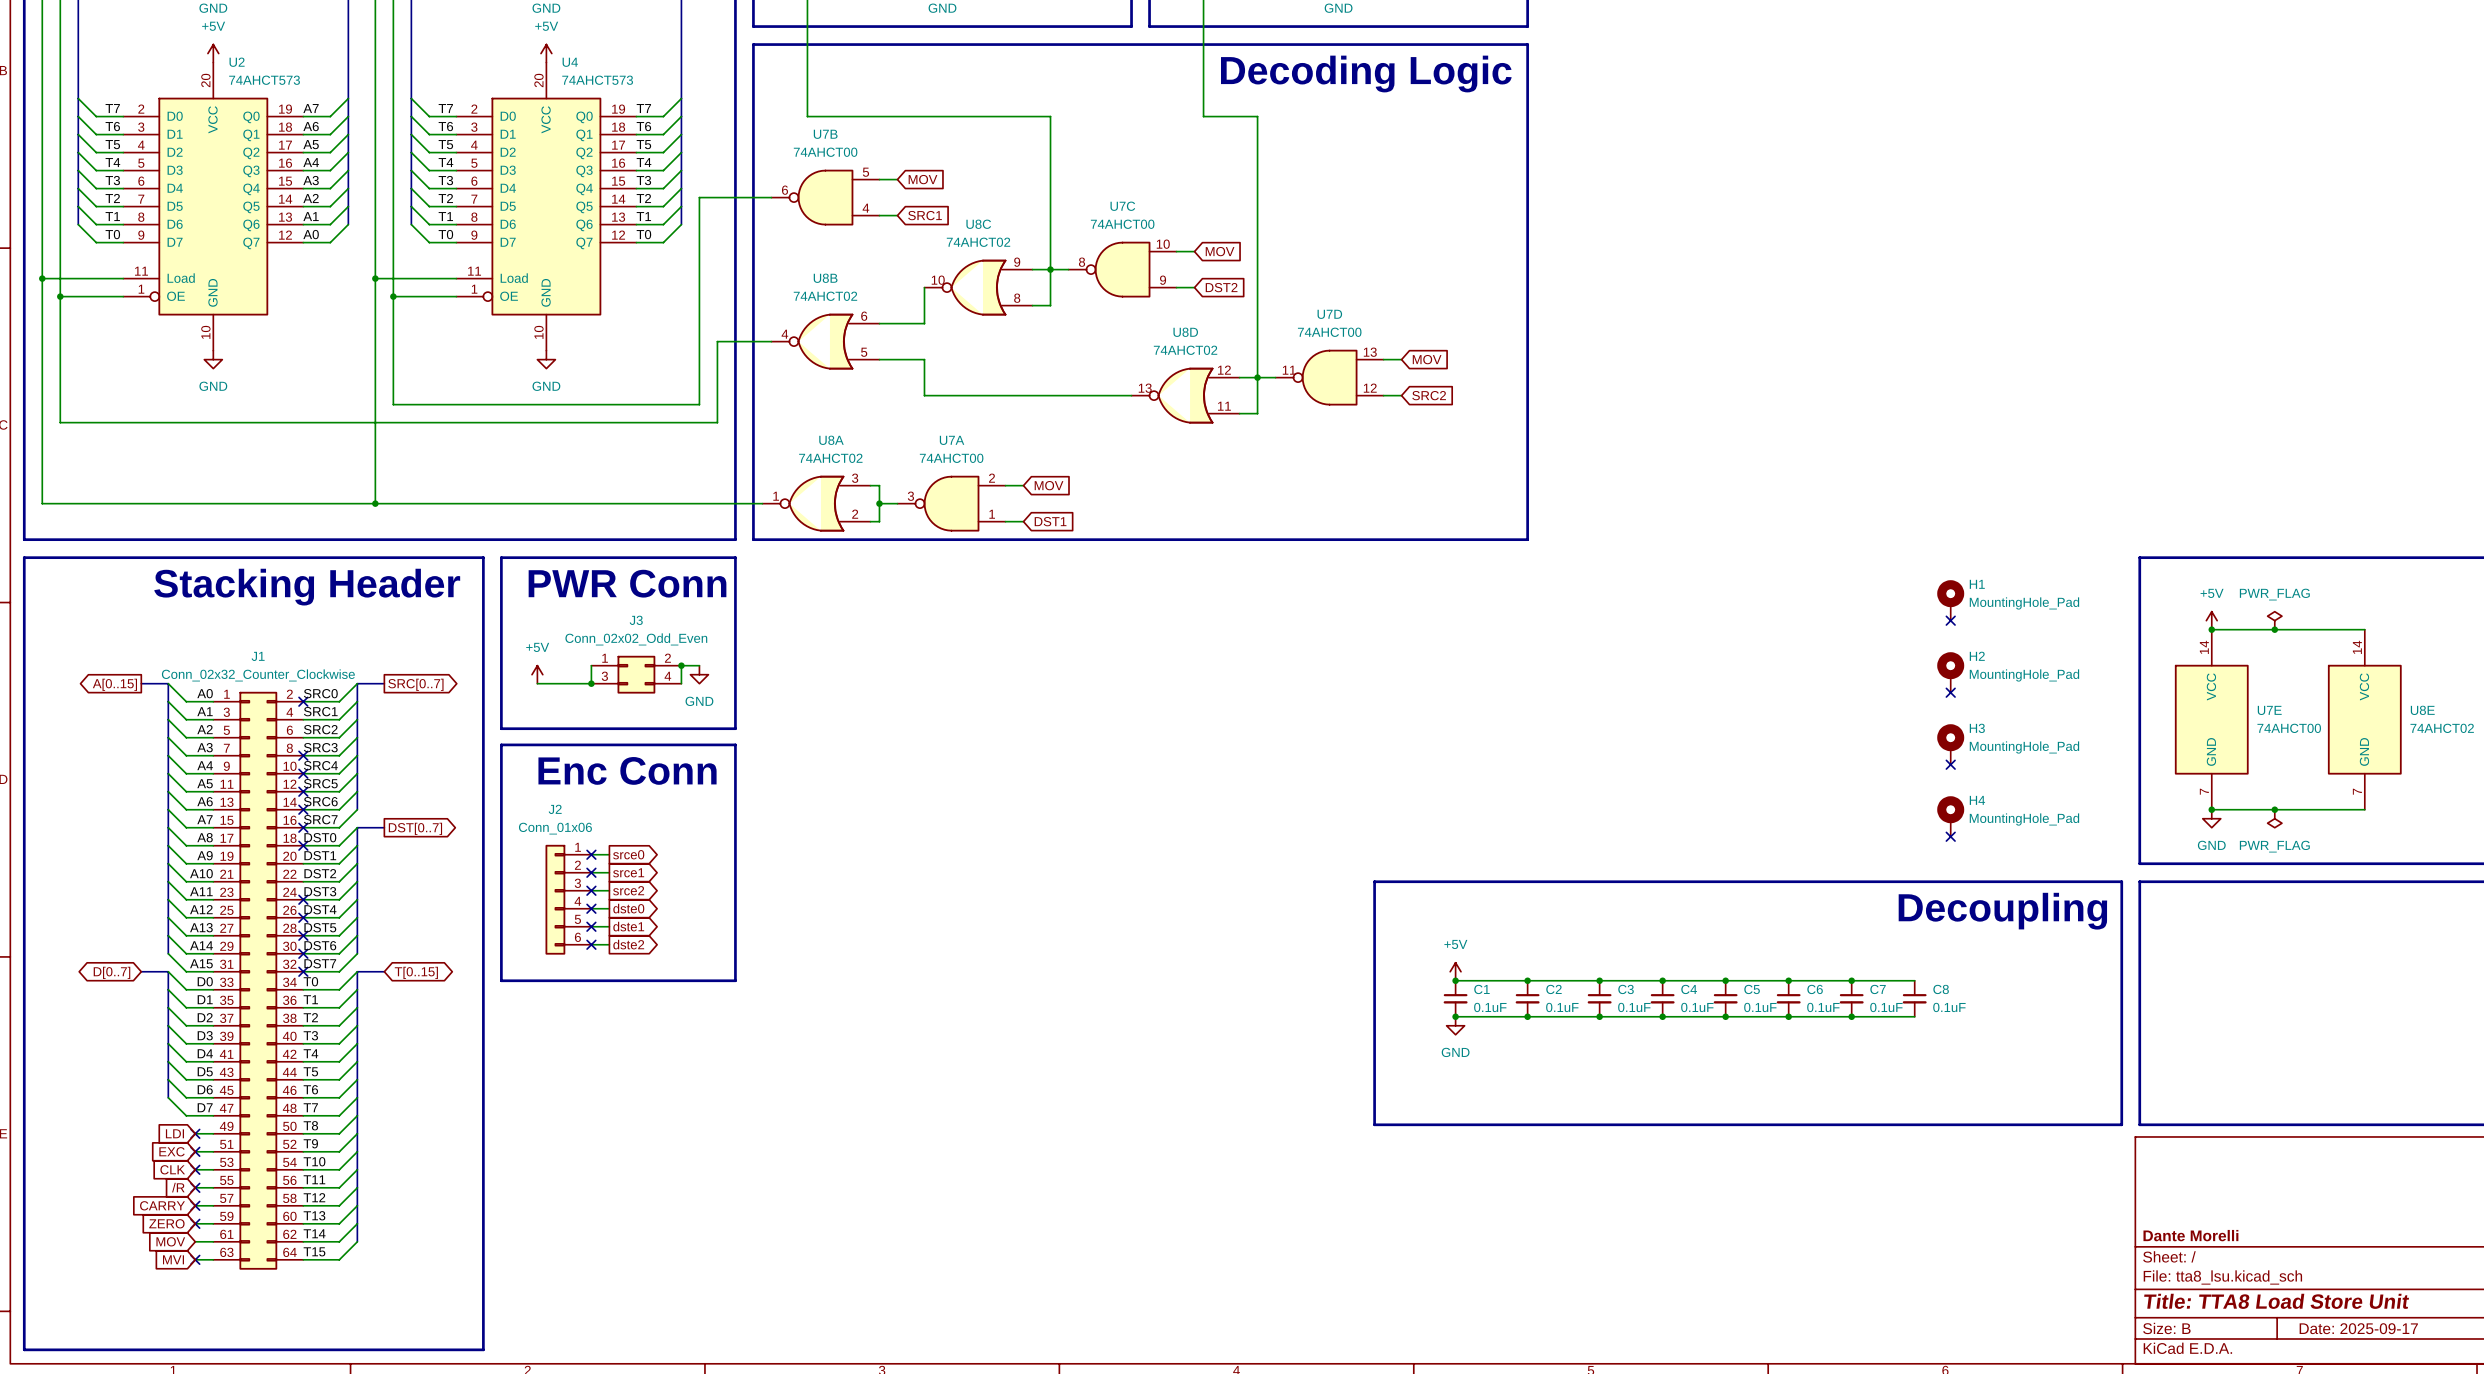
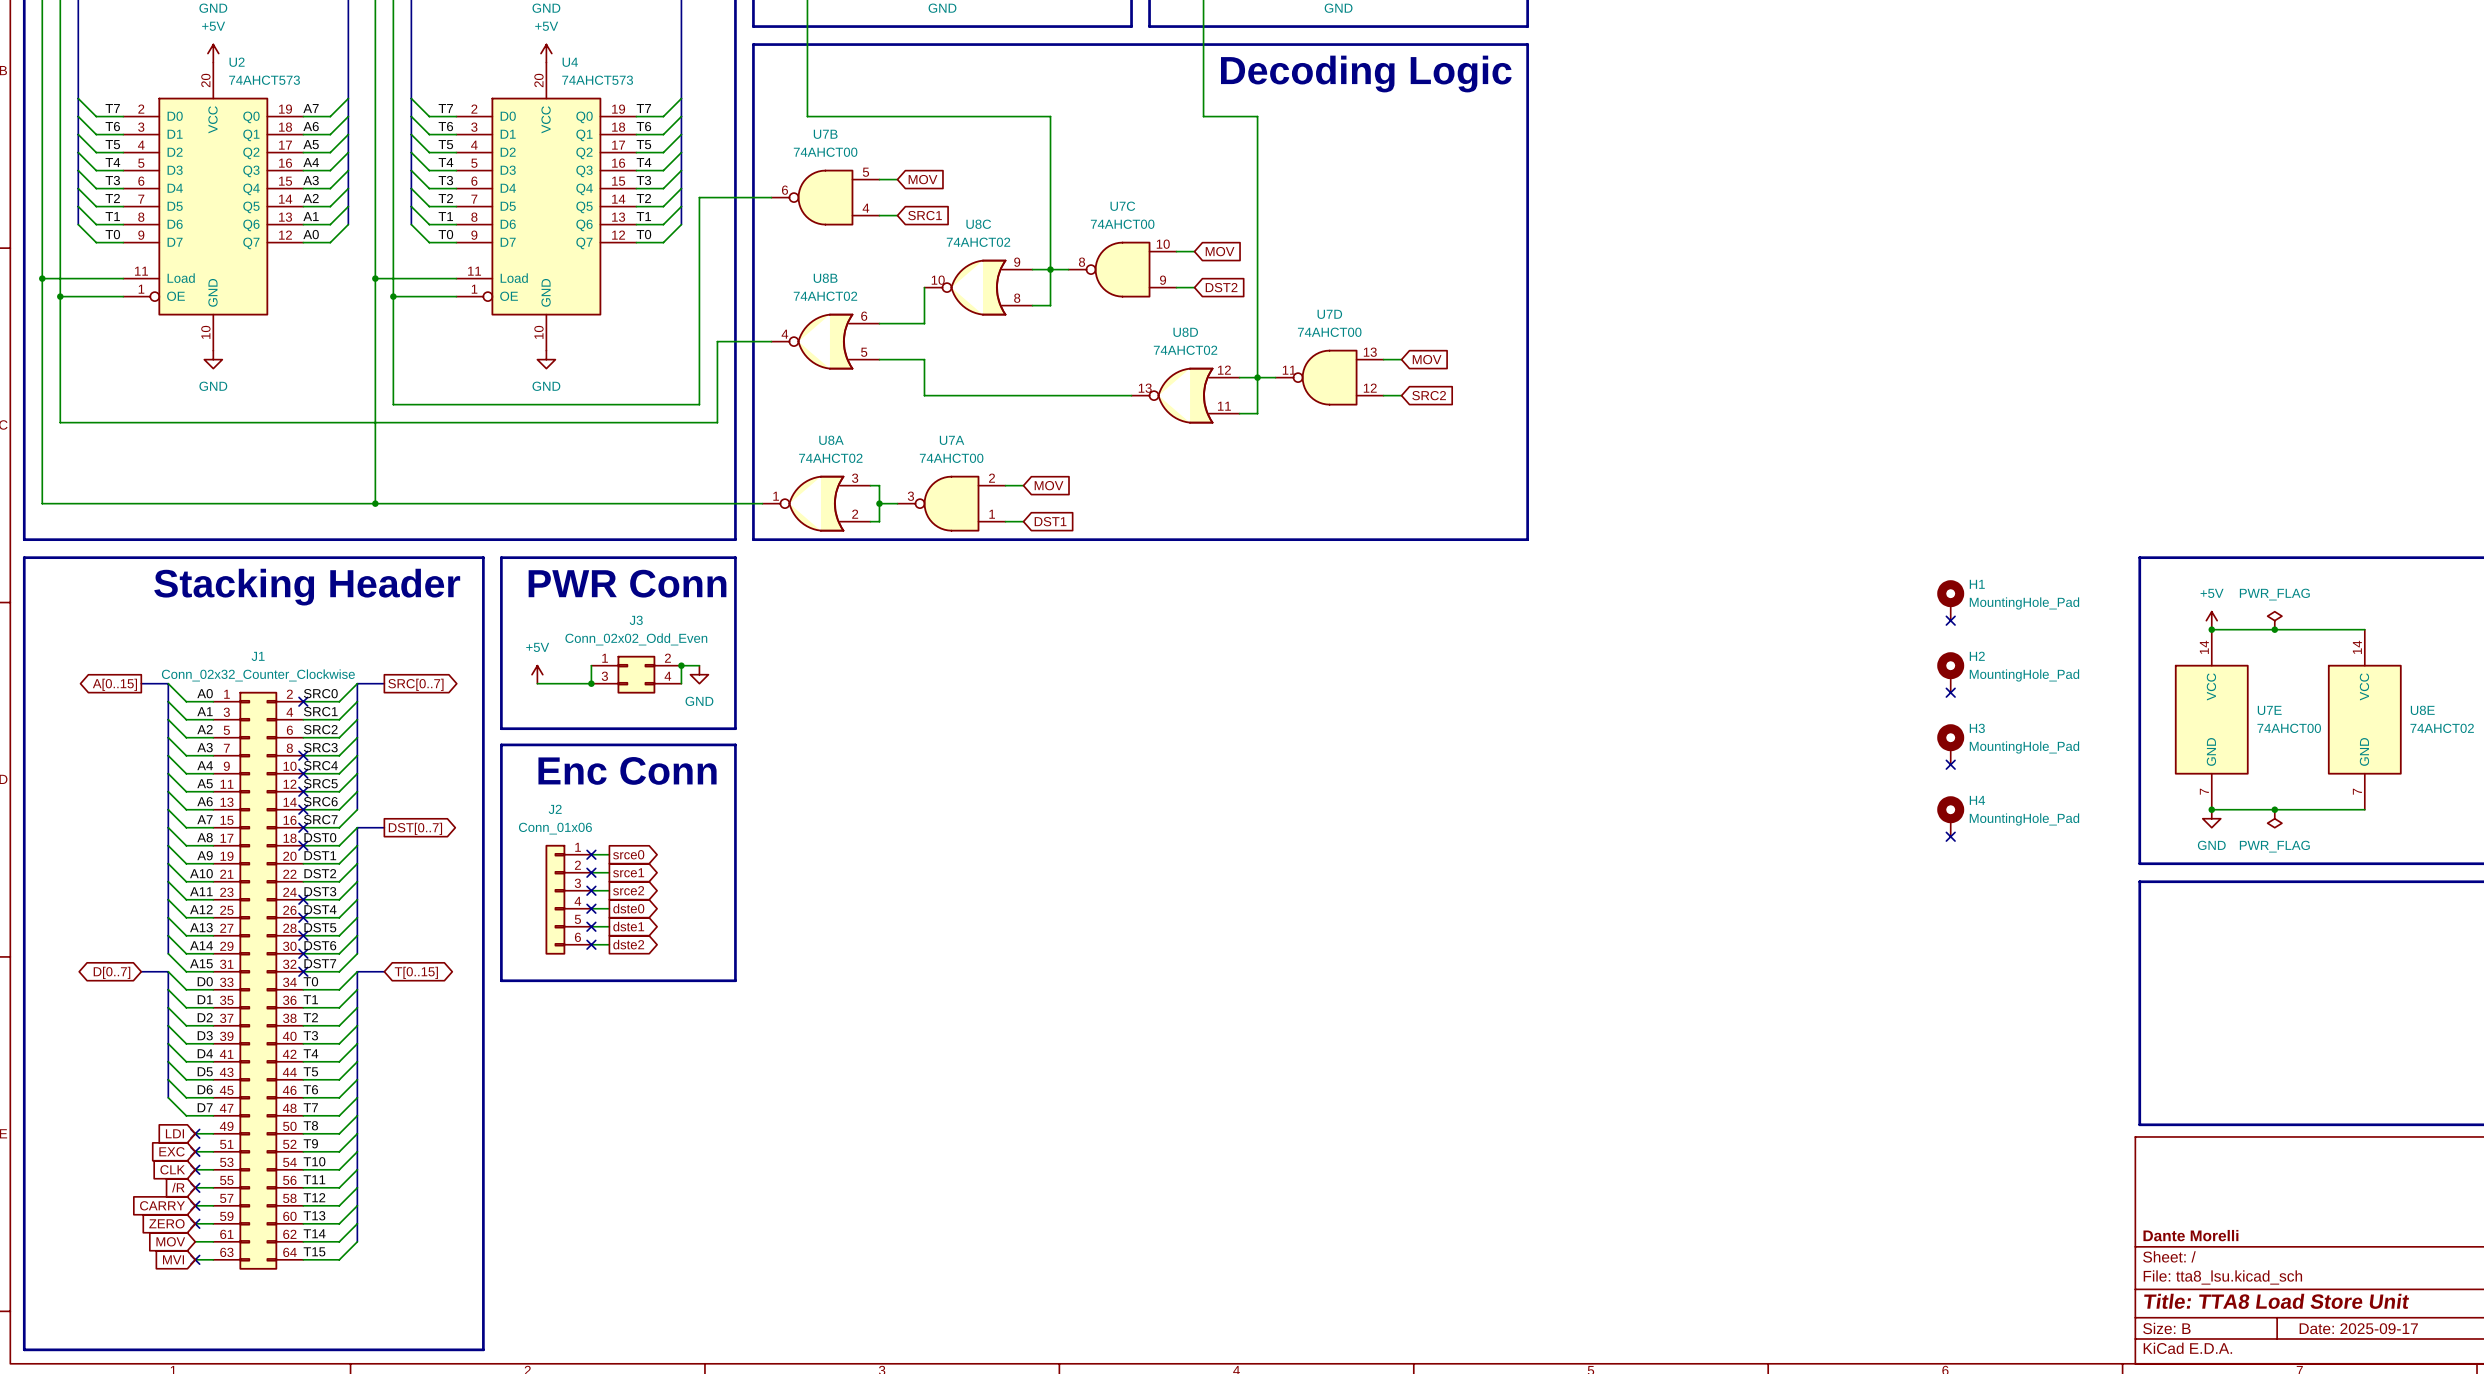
line: (1374, 881) (2121, 881) (2121, 1124) (1374, 1124) (1374, 881) -> none
text: Decoupling (2002, 911) -> none
power symbol: +5V (1455, 971) -> none
wire: (1455, 980) (1914, 980) -> none
junction: (1455, 980) -> none
junction: (1527, 980) -> none
junction: (1599, 980) -> none
junction: (1662, 980) -> none
junction: (1725, 980) -> none
junction: (1788, 980) -> none
junction: (1851, 980) -> none
C1: 0.1uF (1455, 998) -> none
C2: 0.1uF (1527, 998) -> none
C3: 0.1uF (1599, 998) -> none
C4: 0.1uF (1662, 998) -> none
C5: 0.1uF (1725, 998) -> none
C6: 0.1uF (1788, 998) -> none
C7: 0.1uF (1851, 998) -> none
C8: 0.1uF (1914, 998) -> none
wire: (1455, 1016) (1914, 1016) -> none
junction: (1455, 1016) -> none
junction: (1527, 1016) -> none
junction: (1599, 1016) -> none
junction: (1662, 1016) -> none
junction: (1725, 1016) -> none
junction: (1788, 1016) -> none
junction: (1851, 1016) -> none
power symbol: GND (1455, 1025) -> none

